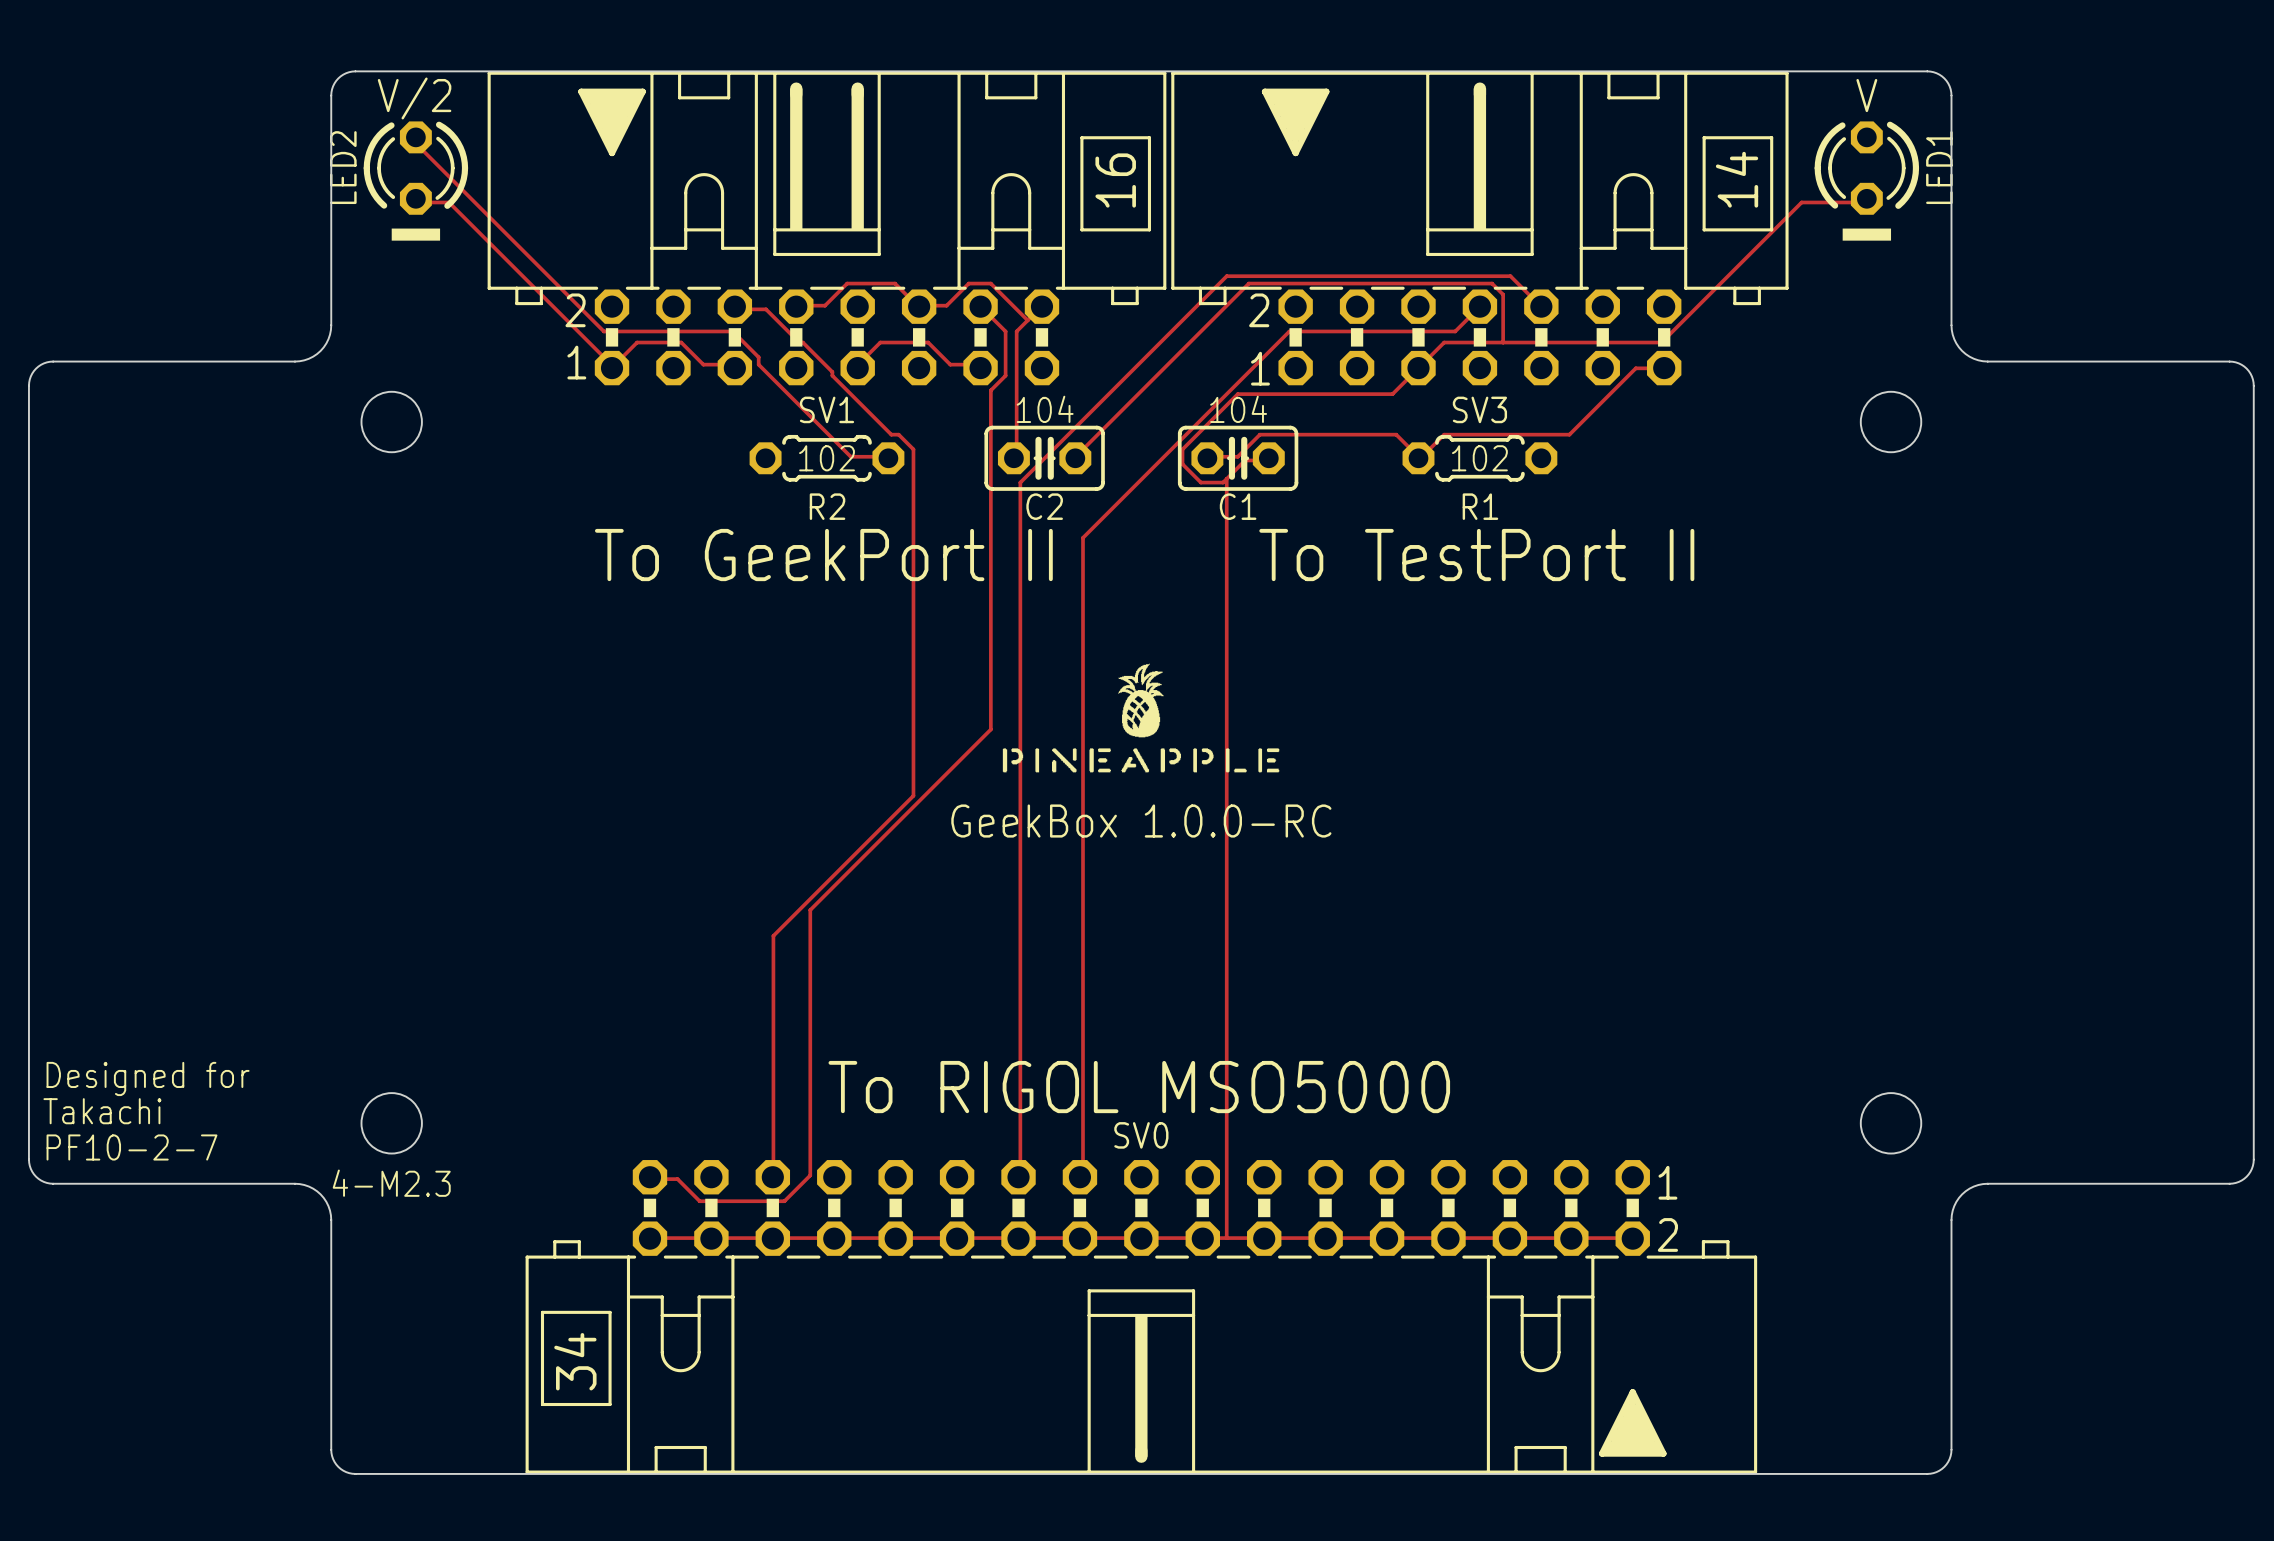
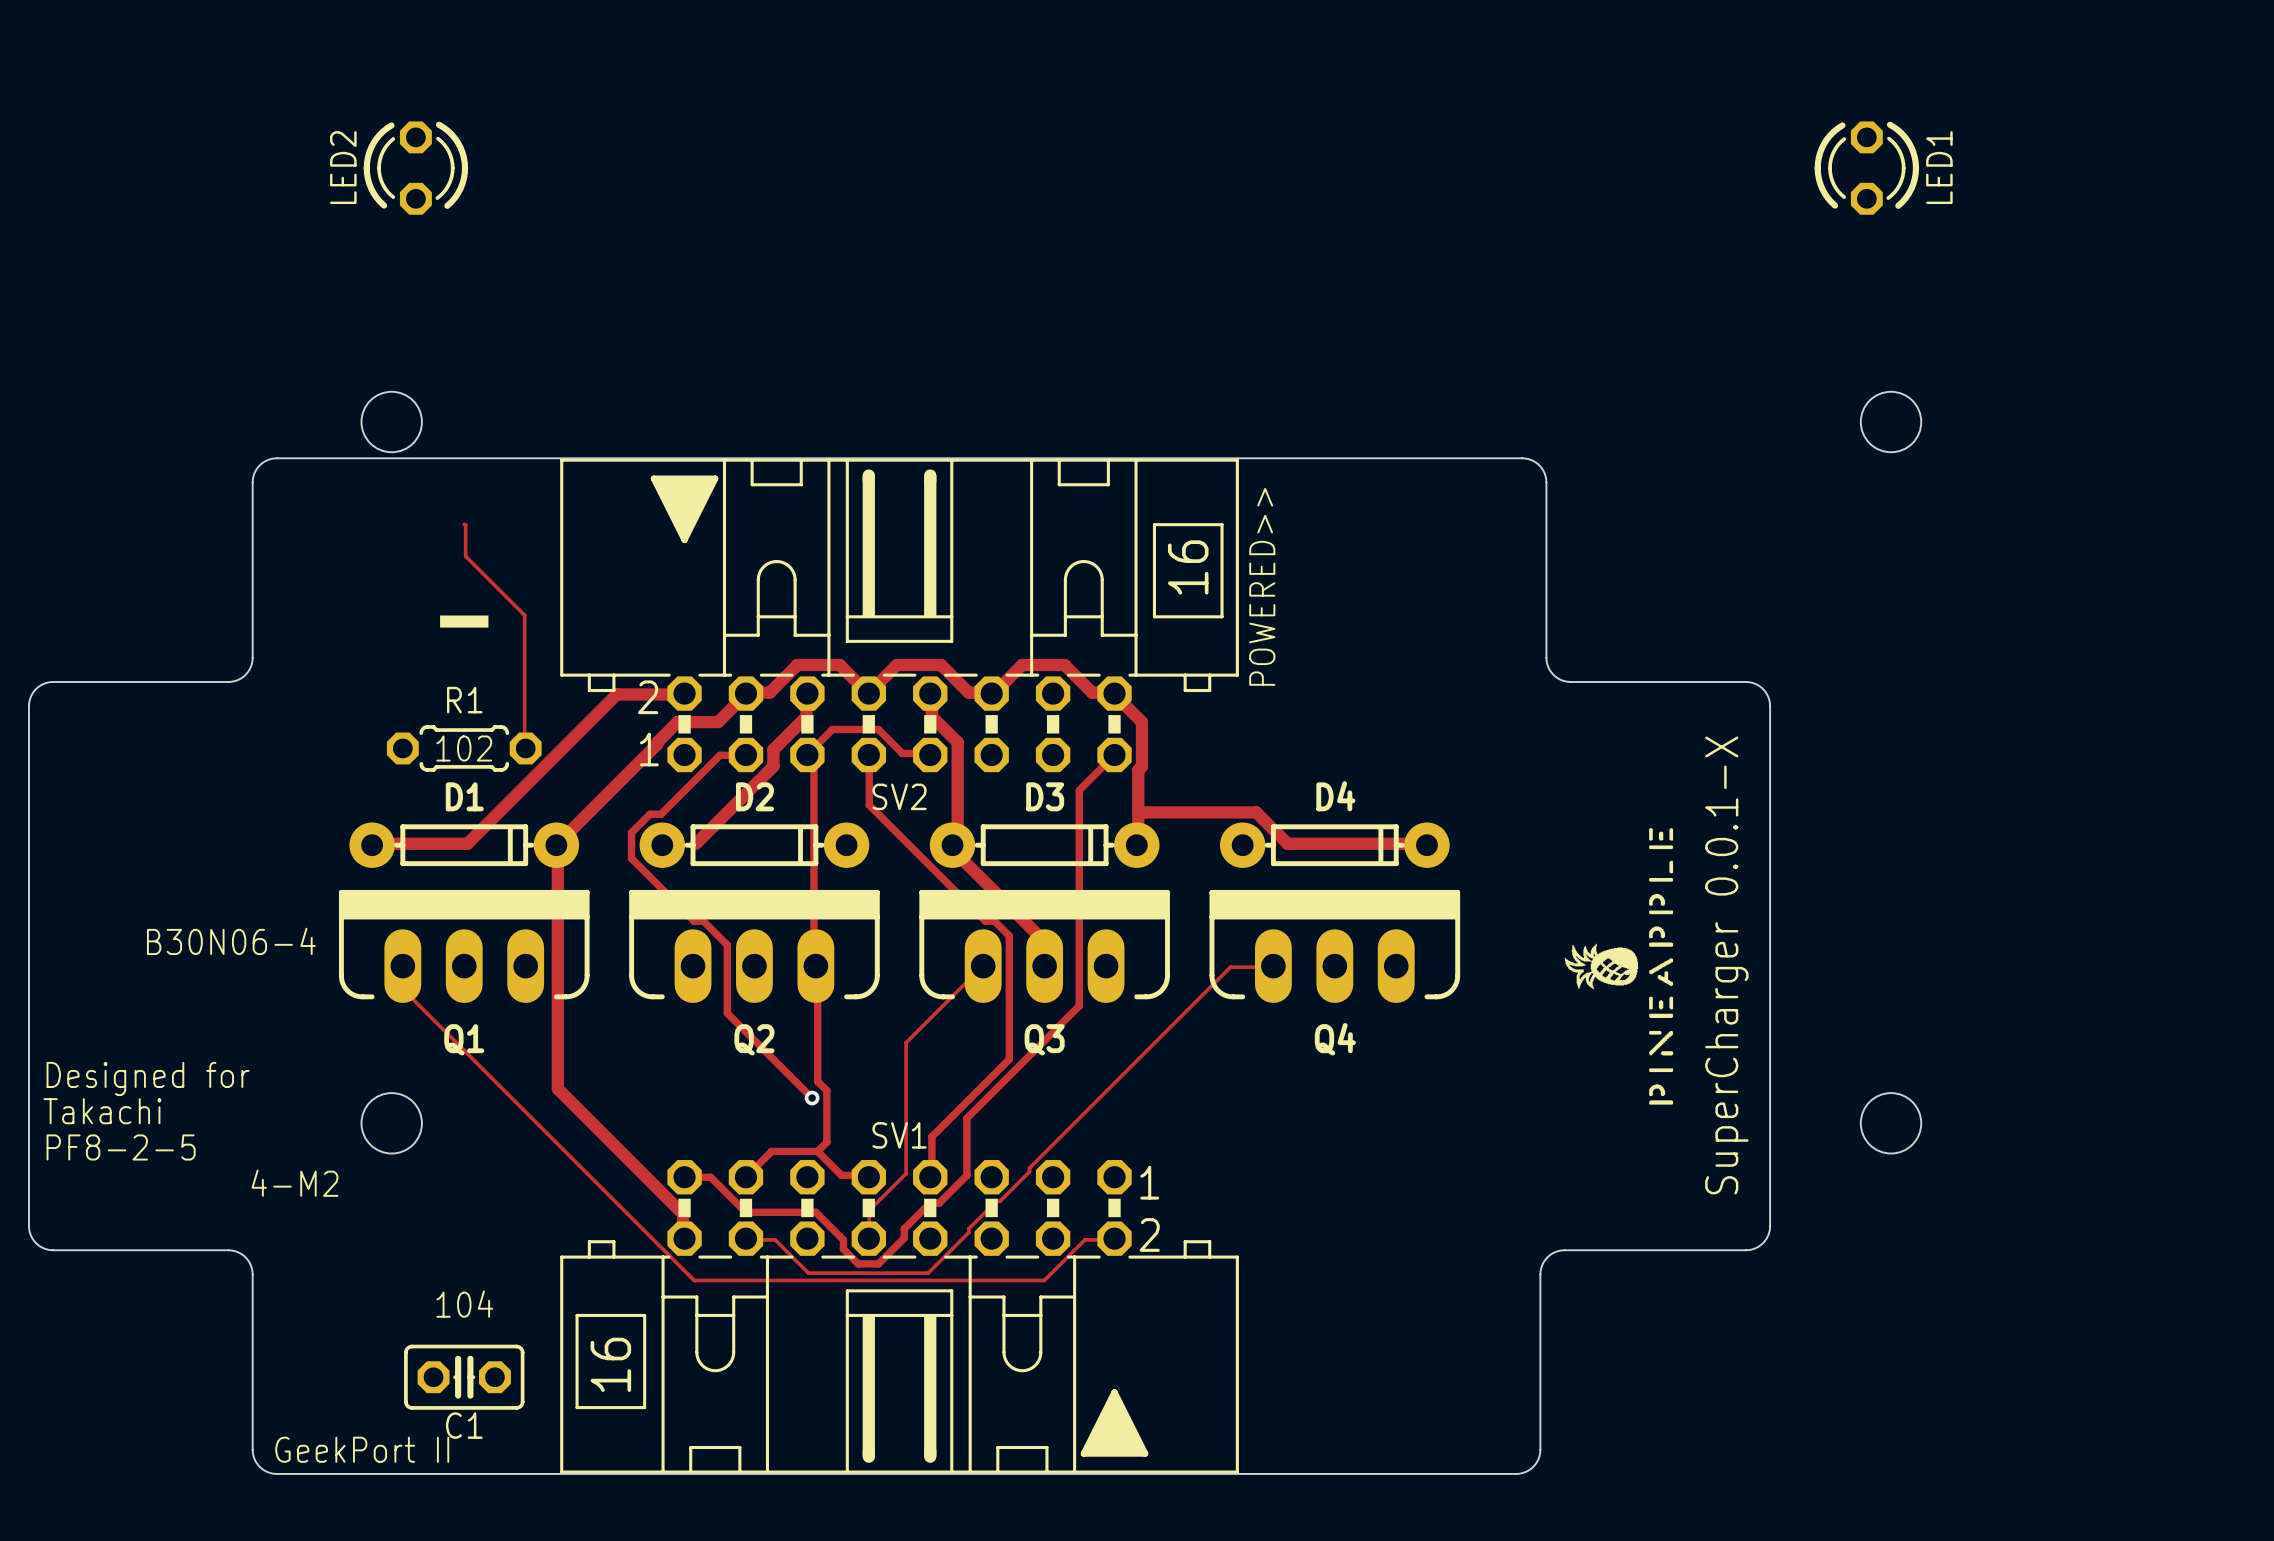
SV1 footprint: [487, 71, 1167, 386] -> [560, 1160, 1239, 1474]
text: V (1866, 95) -> none
text: V/2 (414, 98) -> none
track: (415, 137) (412, 139) (603, 331) (732, 331) (758, 357) (758, 364) (850, 456) (888, 458) -> none
track: (415, 198) (415, 202) (449, 202) (611, 364) (612, 368) (637, 342) (681, 342) (703, 364) (732, 364) (734, 368) -> none
track: (1866, 198) (1864, 202) (1801, 202) (1661, 342) (1444, 342) (1418, 368) -> none
SV3: (1479, 228) -> none
drawing: [1842, 228, 1892, 241] -> none
drawing position: (415, 234) -> (464, 621)
track: (734, 306) (736, 309) (766, 309) (832, 372) (832, 375) (891, 434) (898, 434) (913, 449) (913, 795) (773, 935) (772, 1177) -> none
track: (796, 306) (825, 305) (847, 283) (895, 283) (919, 306) (946, 305) (968, 283) (990, 283) (1027, 320) -> none
track: (980, 306) (1005, 331) (1005, 375) (990, 390) (990, 729) (810, 910) (810, 1175) (784, 1201) (699, 1201) (677, 1179) (651, 1179) (649, 1177) -> none
track: (1041, 306) (1016, 331) (1016, 456) (1013, 458) -> none
track: (1479, 306) (1455, 331) (1289, 331) (1083, 537) (1083, 1175) (1079, 1177) -> none
track: (1541, 306) (1510, 276) (1226, 276) (1020, 482) (1020, 1175) (1018, 1177) -> none
track: (1503, 342) (1503, 294) (1492, 283) (1248, 283) (1075, 458) -> none
track: (857, 368) (858, 364) (880, 342) (928, 342) (950, 364) (979, 364) (980, 368) -> none
track: (1418, 368) (1392, 394) (1237, 394) (1182, 449) (1182, 464) (1200, 482) (1223, 482) (1245, 460) (1267, 460) (1268, 458) -> none
track: (1664, 368) (1635, 368) (1569, 434) (1444, 434) (1418, 458) (1396, 434) (1259, 434) (1237, 456) (1207, 458) -> none
SV1 name position: SV1 (826, 409) -> SV1 (899, 1135)
text: 104 (1045, 409) -> none
text: 104 (1238, 409) -> none
text position: 102 (826, 458) -> 102 (464, 748)
R2: (826, 458) -> none
C2: (1044, 458) -> none
C1 position: (1238, 458) -> (464, 1377)
text: 102 (1479, 458) -> none
R1 position: (1479, 458) -> (464, 748)
track: (1226, 478) (1226, 1238) -> none
R1 name position: R1 (1480, 506) -> R1 (464, 700)
track: none -> (464, 524) (465, 556) (524, 615) (525, 748)
text: To GeekPort II (823, 555) -> none
text: To TestPort II (1476, 555) -> none
text: none -> POWERED>> (1262, 586)
SV2: none -> (899, 615)
drawing: [1002, 663, 1280, 773] -> none
track: none -> (684, 693) (616, 694) (467, 843) (372, 845)
track: none -> (807, 693) (806, 716) (773, 749) (773, 766) (696, 843)
track: none -> (930, 693) (931, 694) (931, 716) (957, 742) (957, 840) (952, 845) (954, 851) (1044, 941) (1044, 966)
board edge: (28, 706) (28, 385) (32, 373) (38, 366) (50, 361) (294, 361) (308, 358) (320, 350) (328, 339) (331, 325) (331, 92) (336, 80) (349, 72) (1927, 71) (1939, 74) (1946, 80) (1951, 92) (1951, 325) (1954, 339) (1962, 350) (1973, 358) (1987, 361) (2232, 361) (2244, 366) (2252, 379) (2252, 1165) (2244, 1178) (2232, 1183) (1987, 1183) (1973, 1186) (1962, 1194) (1954, 1206) (1951, 1220) (1951, 1452) (1946, 1464) (1936, 1472) (1927, 1473) (1516, 1473) -> (28, 706) (33, 691) (41, 685) (50, 682) (228, 681) (237, 680) (245, 674) (250, 667) (252, 657) (252, 479) (259, 465) (273, 458) (1522, 458) (1534, 461) (1541, 467) (1546, 479) (1546, 657) (1548, 667) (1553, 674) (1561, 680) (1570, 681) (1749, 682) (1760, 686) (1769, 699) (1770, 1226) (1765, 1240) (1758, 1247) (1749, 1250) (1564, 1250) (1555, 1252) (1547, 1257) (1542, 1265) (1540, 1274) (1540, 1452) (1537, 1461) (1530, 1468) (1516, 1473)
track: none -> (745, 755) (719, 755) (661, 814) (649, 814) (631, 832) (631, 858) (694, 921) (703, 921) (727, 945) (727, 1013) (812, 1098)
track: none -> (868, 755) (869, 805) (985, 921) (994, 921) (1009, 935) (1009, 1059) (931, 1136) (931, 1175) (930, 1177)
track: none -> (930, 755) (930, 753) (902, 753) (878, 729) (832, 729) (807, 755) (813, 760) (813, 963) (817, 967) (817, 1081) (826, 1090) (826, 1142) (817, 1151)
track: none -> (1114, 755) (1079, 790) (1079, 1005) (966, 1118) (966, 1175) (939, 1203) (930, 1203) (904, 1228) (904, 1238) (878, 1263) (858, 1263) (843, 1249) (843, 1239) (815, 1212) (745, 1212) (710, 1177) (684, 1177)
track: none -> (1138, 812) (1256, 812) (1287, 843) (1426, 845)
text: GeekBox 1.0.0-RC (1141, 821) -> none
drawing: none -> [1564, 828, 1674, 1105]
D1: none -> (464, 845)
D2: none -> (754, 845)
D3: none -> (1044, 845)
track: none -> (1136, 845) (1138, 770) (1141, 766) (1141, 722) (1114, 692) (1092, 692) (1064, 665) (1022, 665) (991, 693) (968, 692) (941, 665) (896, 665) (868, 693) (839, 665) (797, 665) (769, 692) (745, 693) (718, 722) (677, 722) (556, 845) (557, 1088) (683, 1214) (684, 1238)
D4: none -> (1334, 845)
text: none -> B30N06-4 (231, 941)
Q1: none -> (464, 946)
Q2: none -> (754, 946)
Q3: none -> (1044, 946)
Q4: none -> (1334, 946)
text: none -> SuperCharger 0.0.1-X (1726, 965)
track: none -> (402, 966) (403, 989) (694, 1280) (1044, 1280) (1084, 1239) (1114, 1238)
track: none -> (983, 966) (906, 1042) (906, 1173) (869, 1210) (868, 1238)
track: none -> (1273, 966) (1230, 967) (1029, 1168) (1029, 1171) (968, 1228) (968, 1232) (928, 1273) (808, 1273) (775, 1239) (745, 1238)
text: To RIGOL MSO5000 (1139, 1087) -> none
via: none -> (812, 1098)
text: PF10-2-7 (131, 1147) -> PF8-2-5 (121, 1147)
track: none -> (817, 1151) (841, 1175) (867, 1175) (868, 1177)
track: none -> (817, 1151) (771, 1151) (745, 1177)
board edge: (28, 1159) (33, 1174) (41, 1180) (50, 1183) (294, 1183) (308, 1186) (320, 1194) (328, 1206) (331, 1220) (331, 1452) (334, 1461) (340, 1468) (355, 1473) -> (28, 1159) (29, 1229) (33, 1240) (43, 1248) (53, 1250) (228, 1250) (237, 1252) (245, 1257) (250, 1265) (252, 1274) (252, 1449) (255, 1461) (262, 1468) (273, 1473) (355, 1473)
text: 4-M2.3 (391, 1183) -> 4-M2 (294, 1183)
track: (649, 1238) (1632, 1238) -> none
text: none -> 104 (464, 1304)
SV0: (1141, 1316) -> none
text: none -> GeekPort II (362, 1449)

